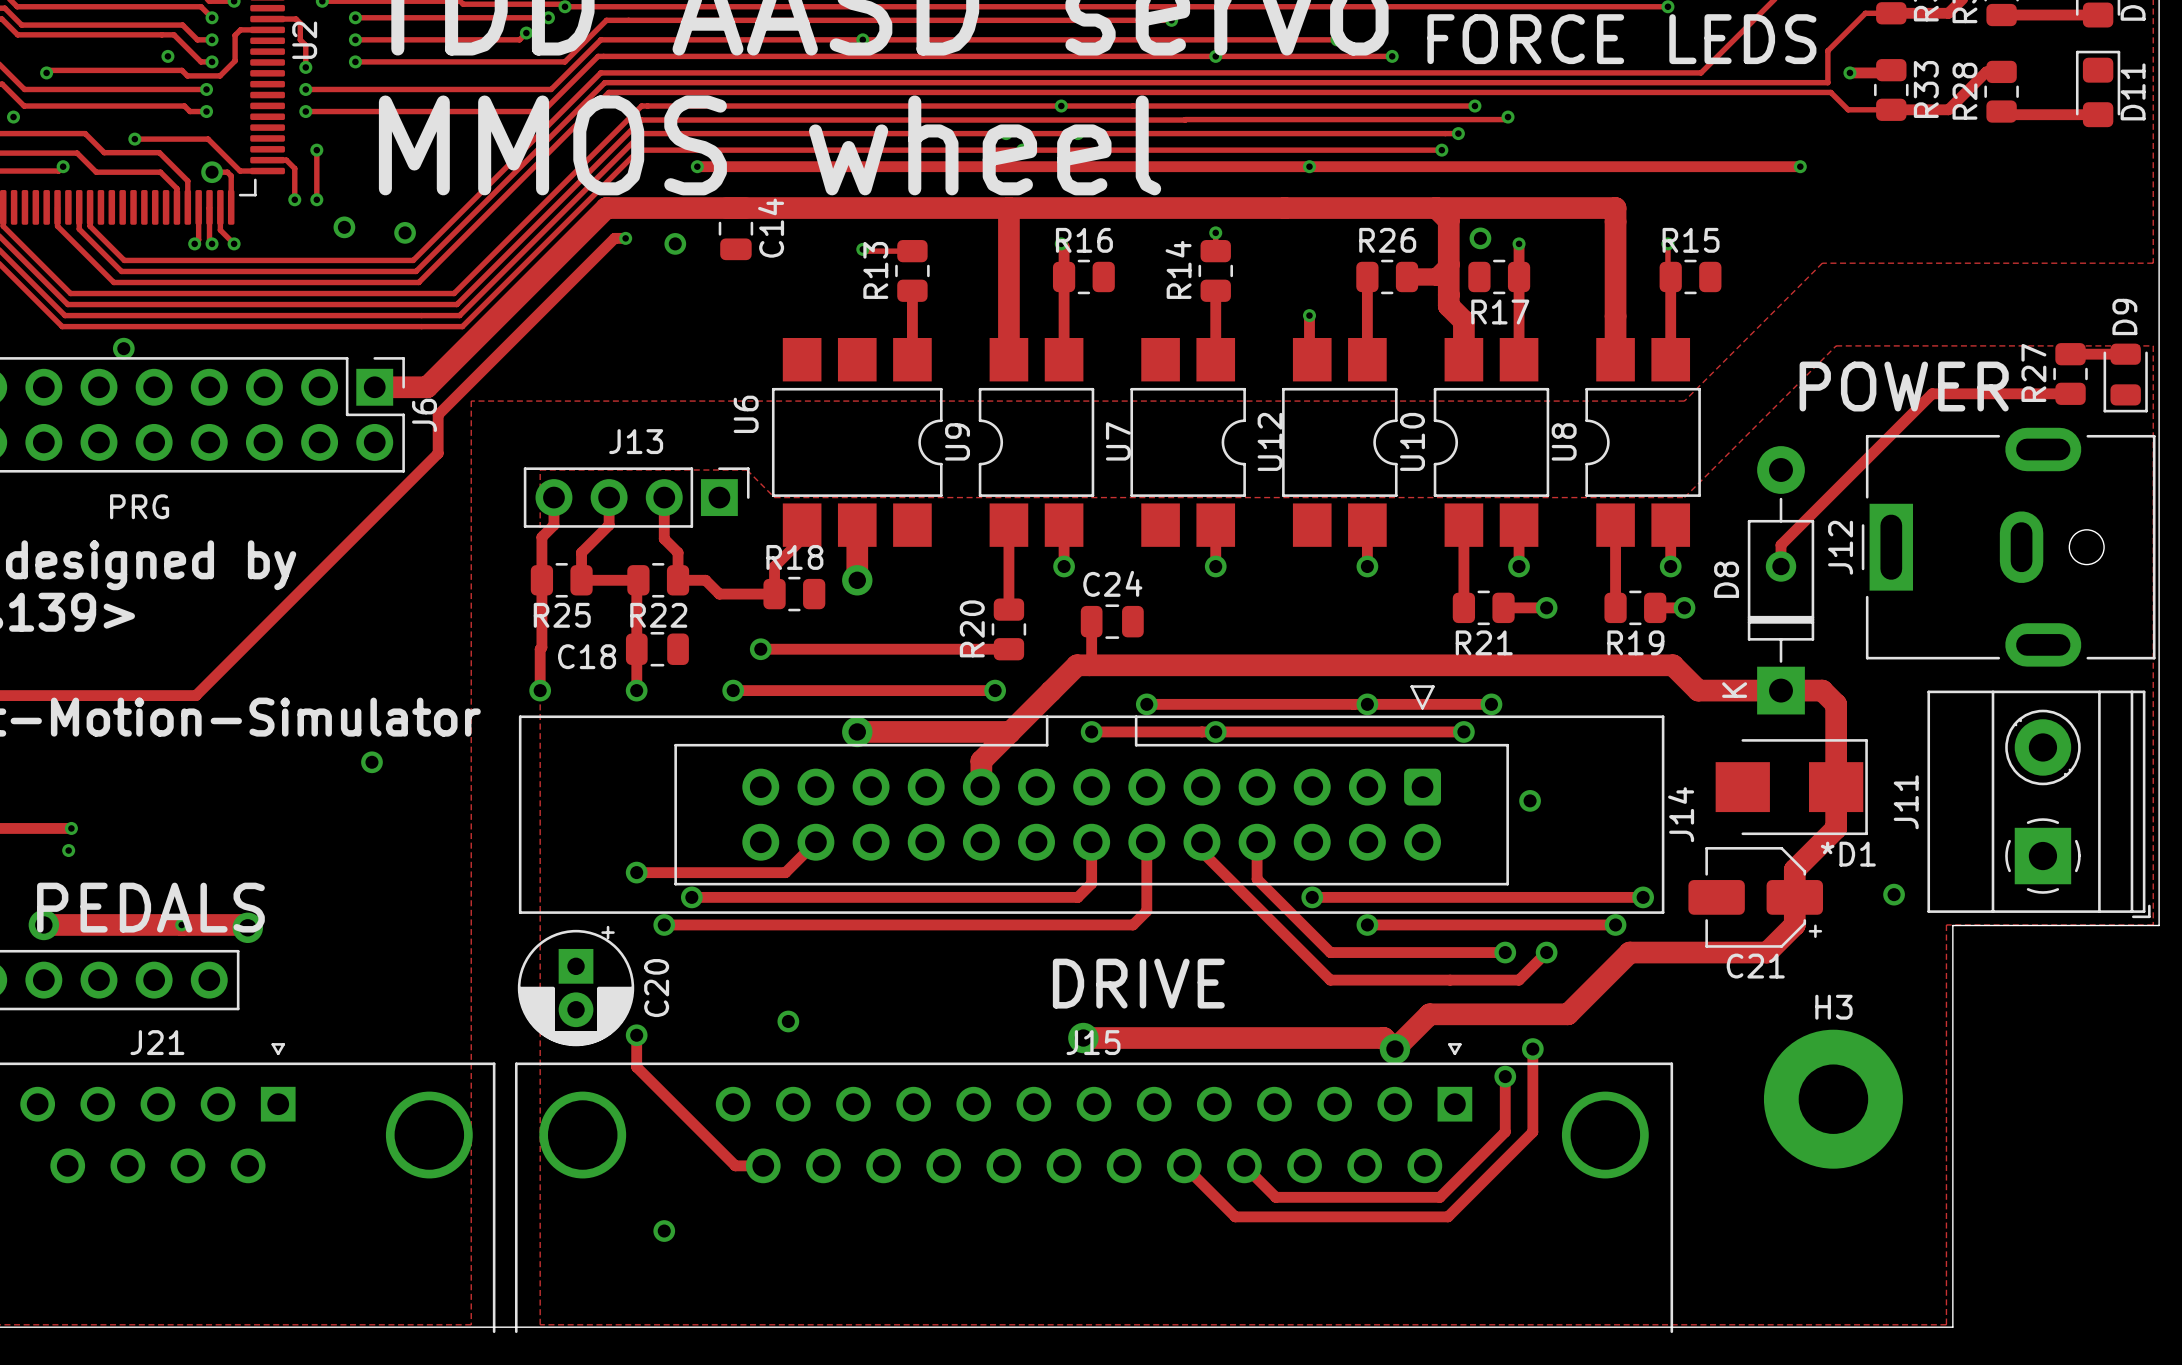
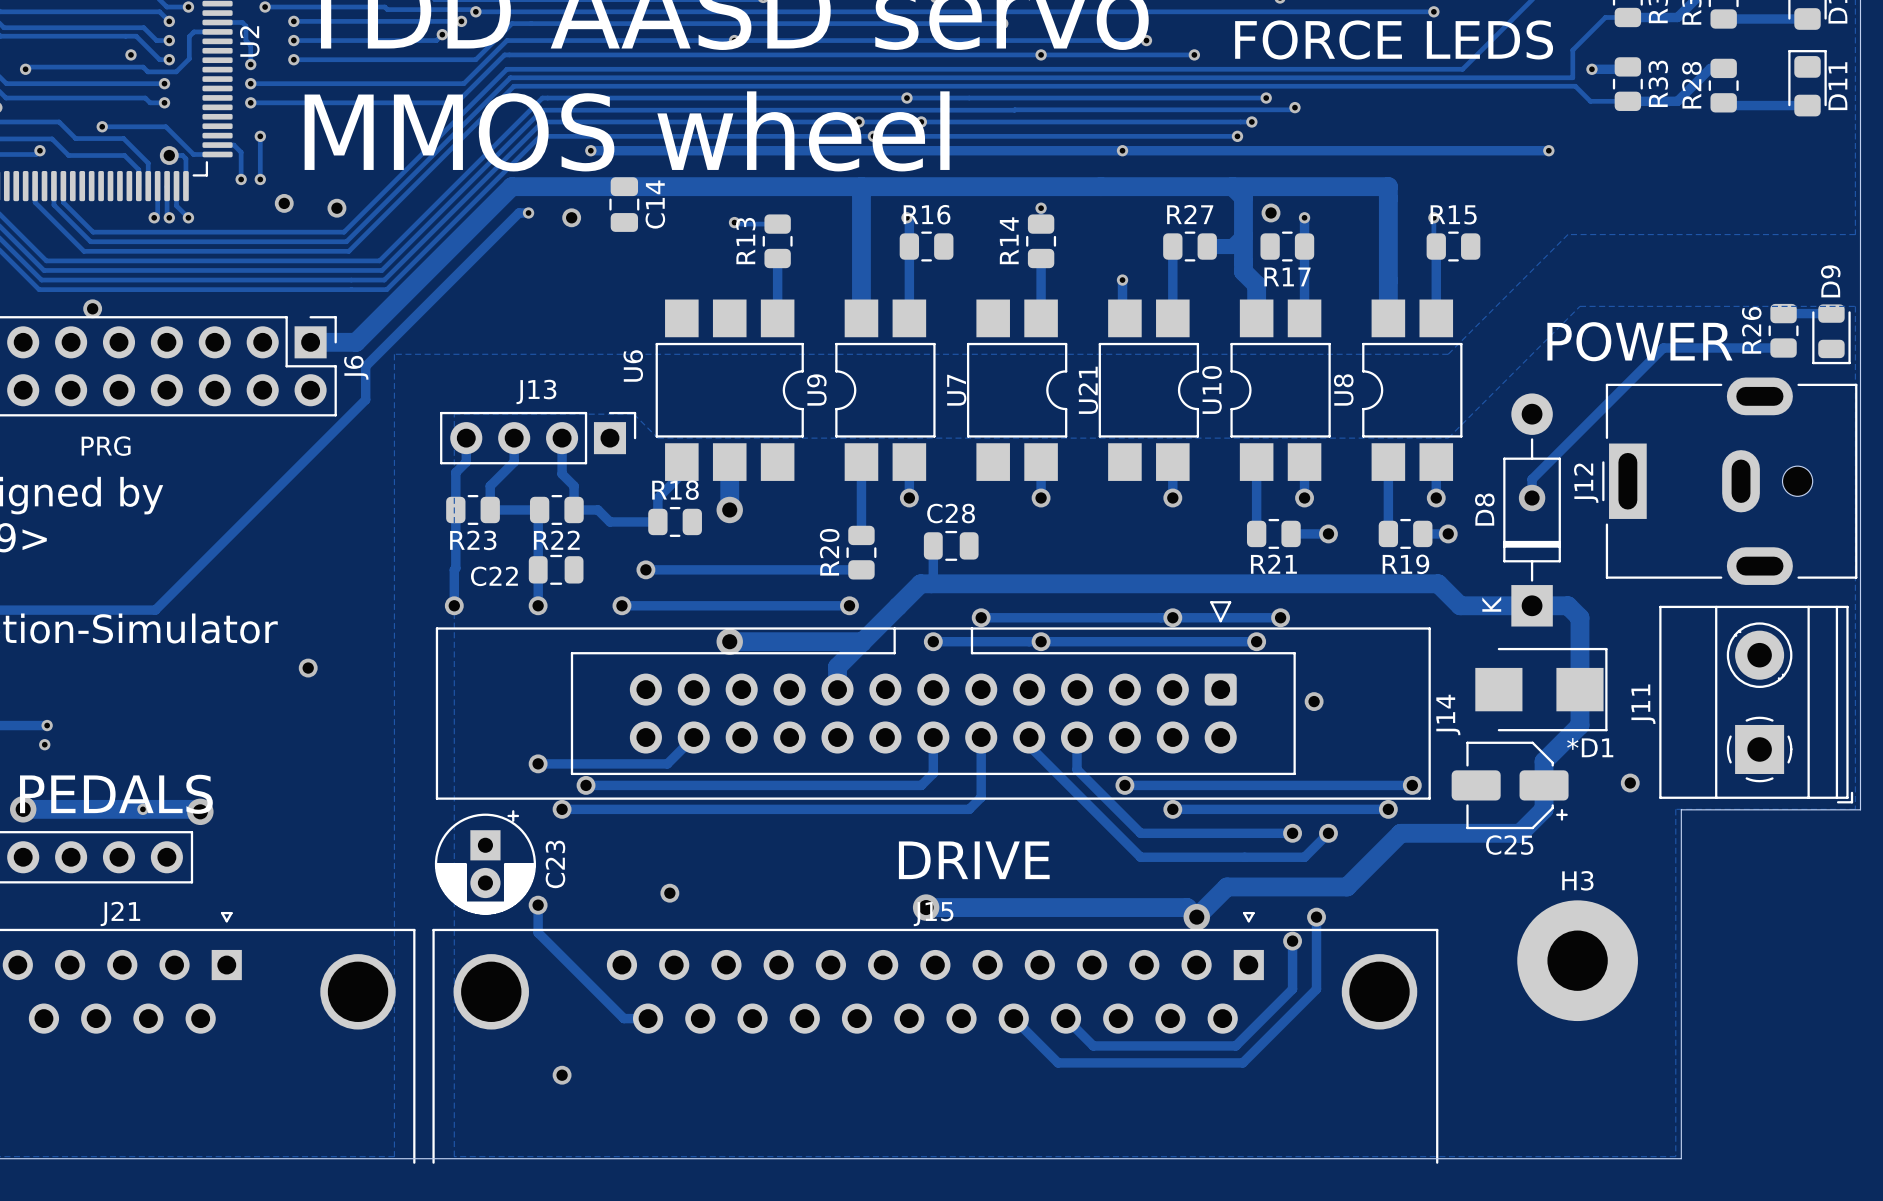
R26 name: R26 (1387, 240) -> R27 (1190, 214)
R27 name: R27 (2033, 372) -> R26 (1751, 330)
U12 name: U12 (1270, 441) -> U21 (1088, 390)
C24 name: C24 (1112, 583) -> C28 (951, 513)
R25 name: R25 (562, 615) -> R23 (473, 540)
C18 name: C18 (587, 656) -> C22 (494, 576)
C21 name: C21 (1755, 966) -> C25 (1509, 845)
C20 name: C20 (656, 988) -> C23 (555, 864)

